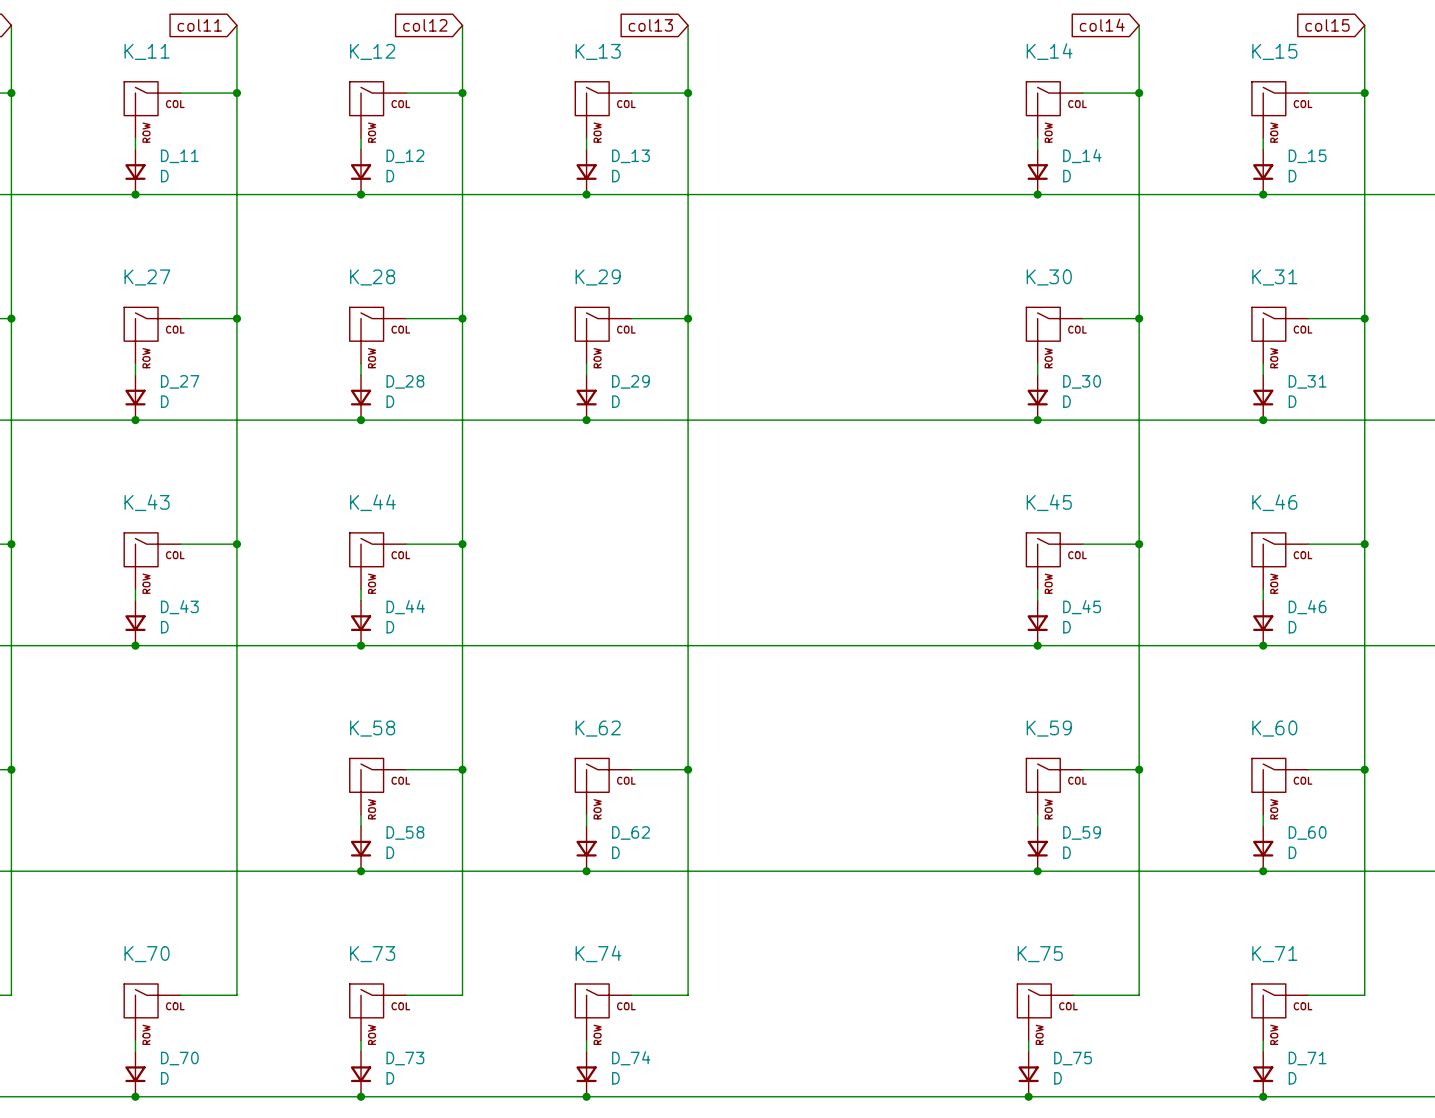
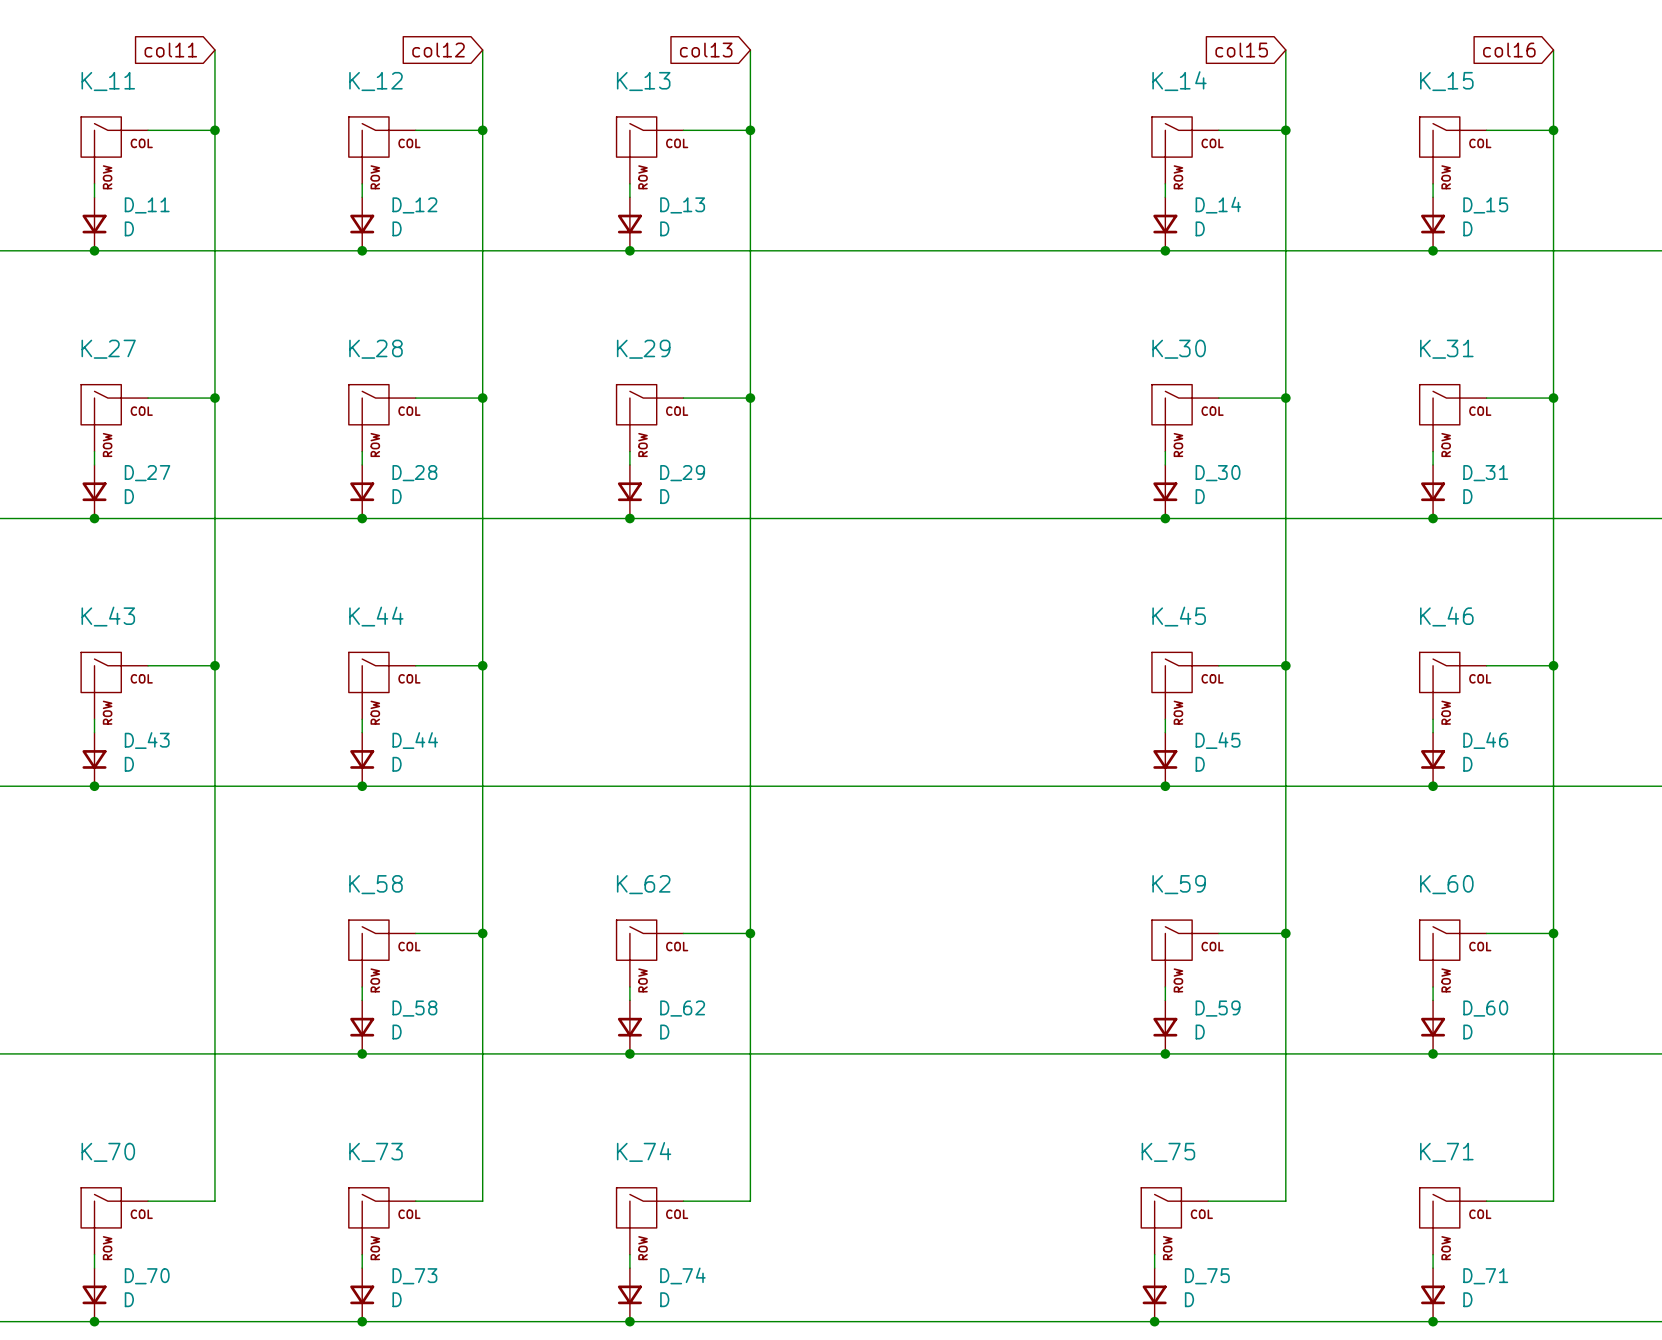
global label: col14 (1102, 25) -> col15 (1241, 50)
global label: col15 (1327, 25) -> col16 (1509, 50)

